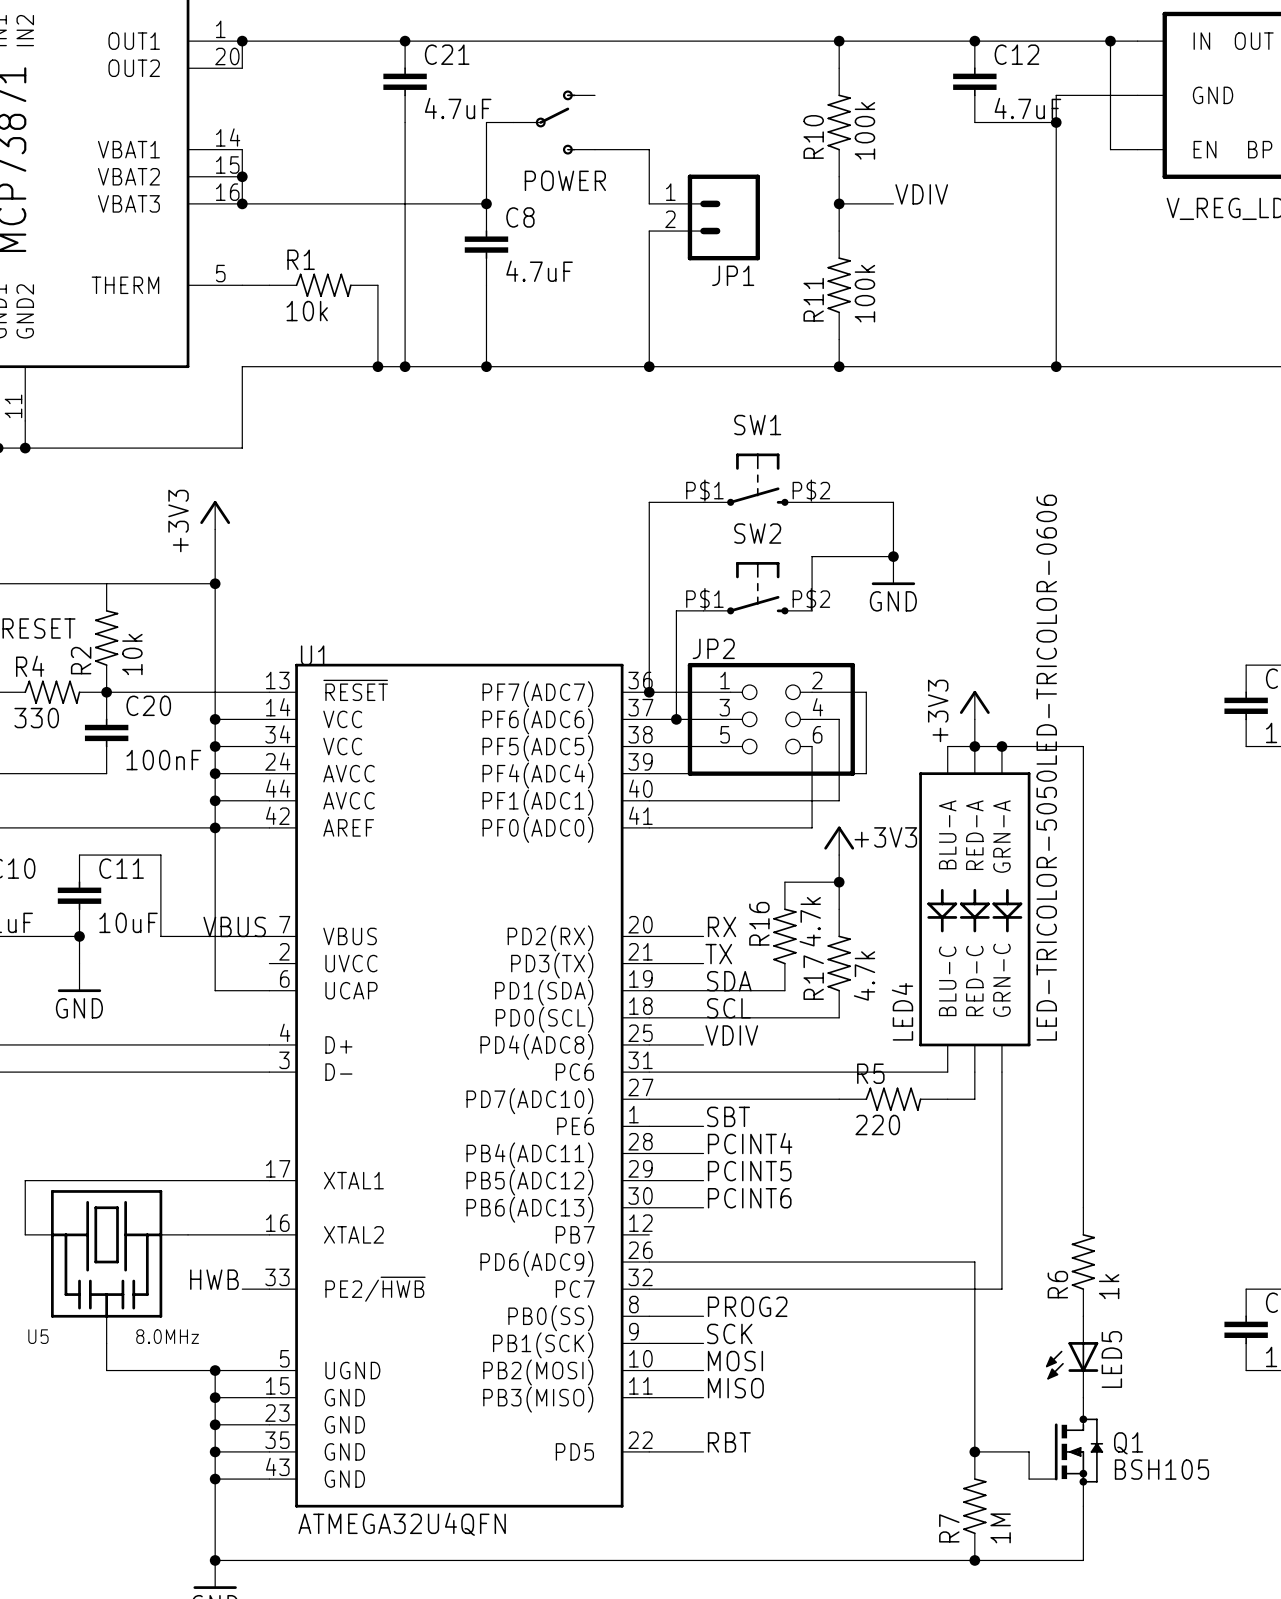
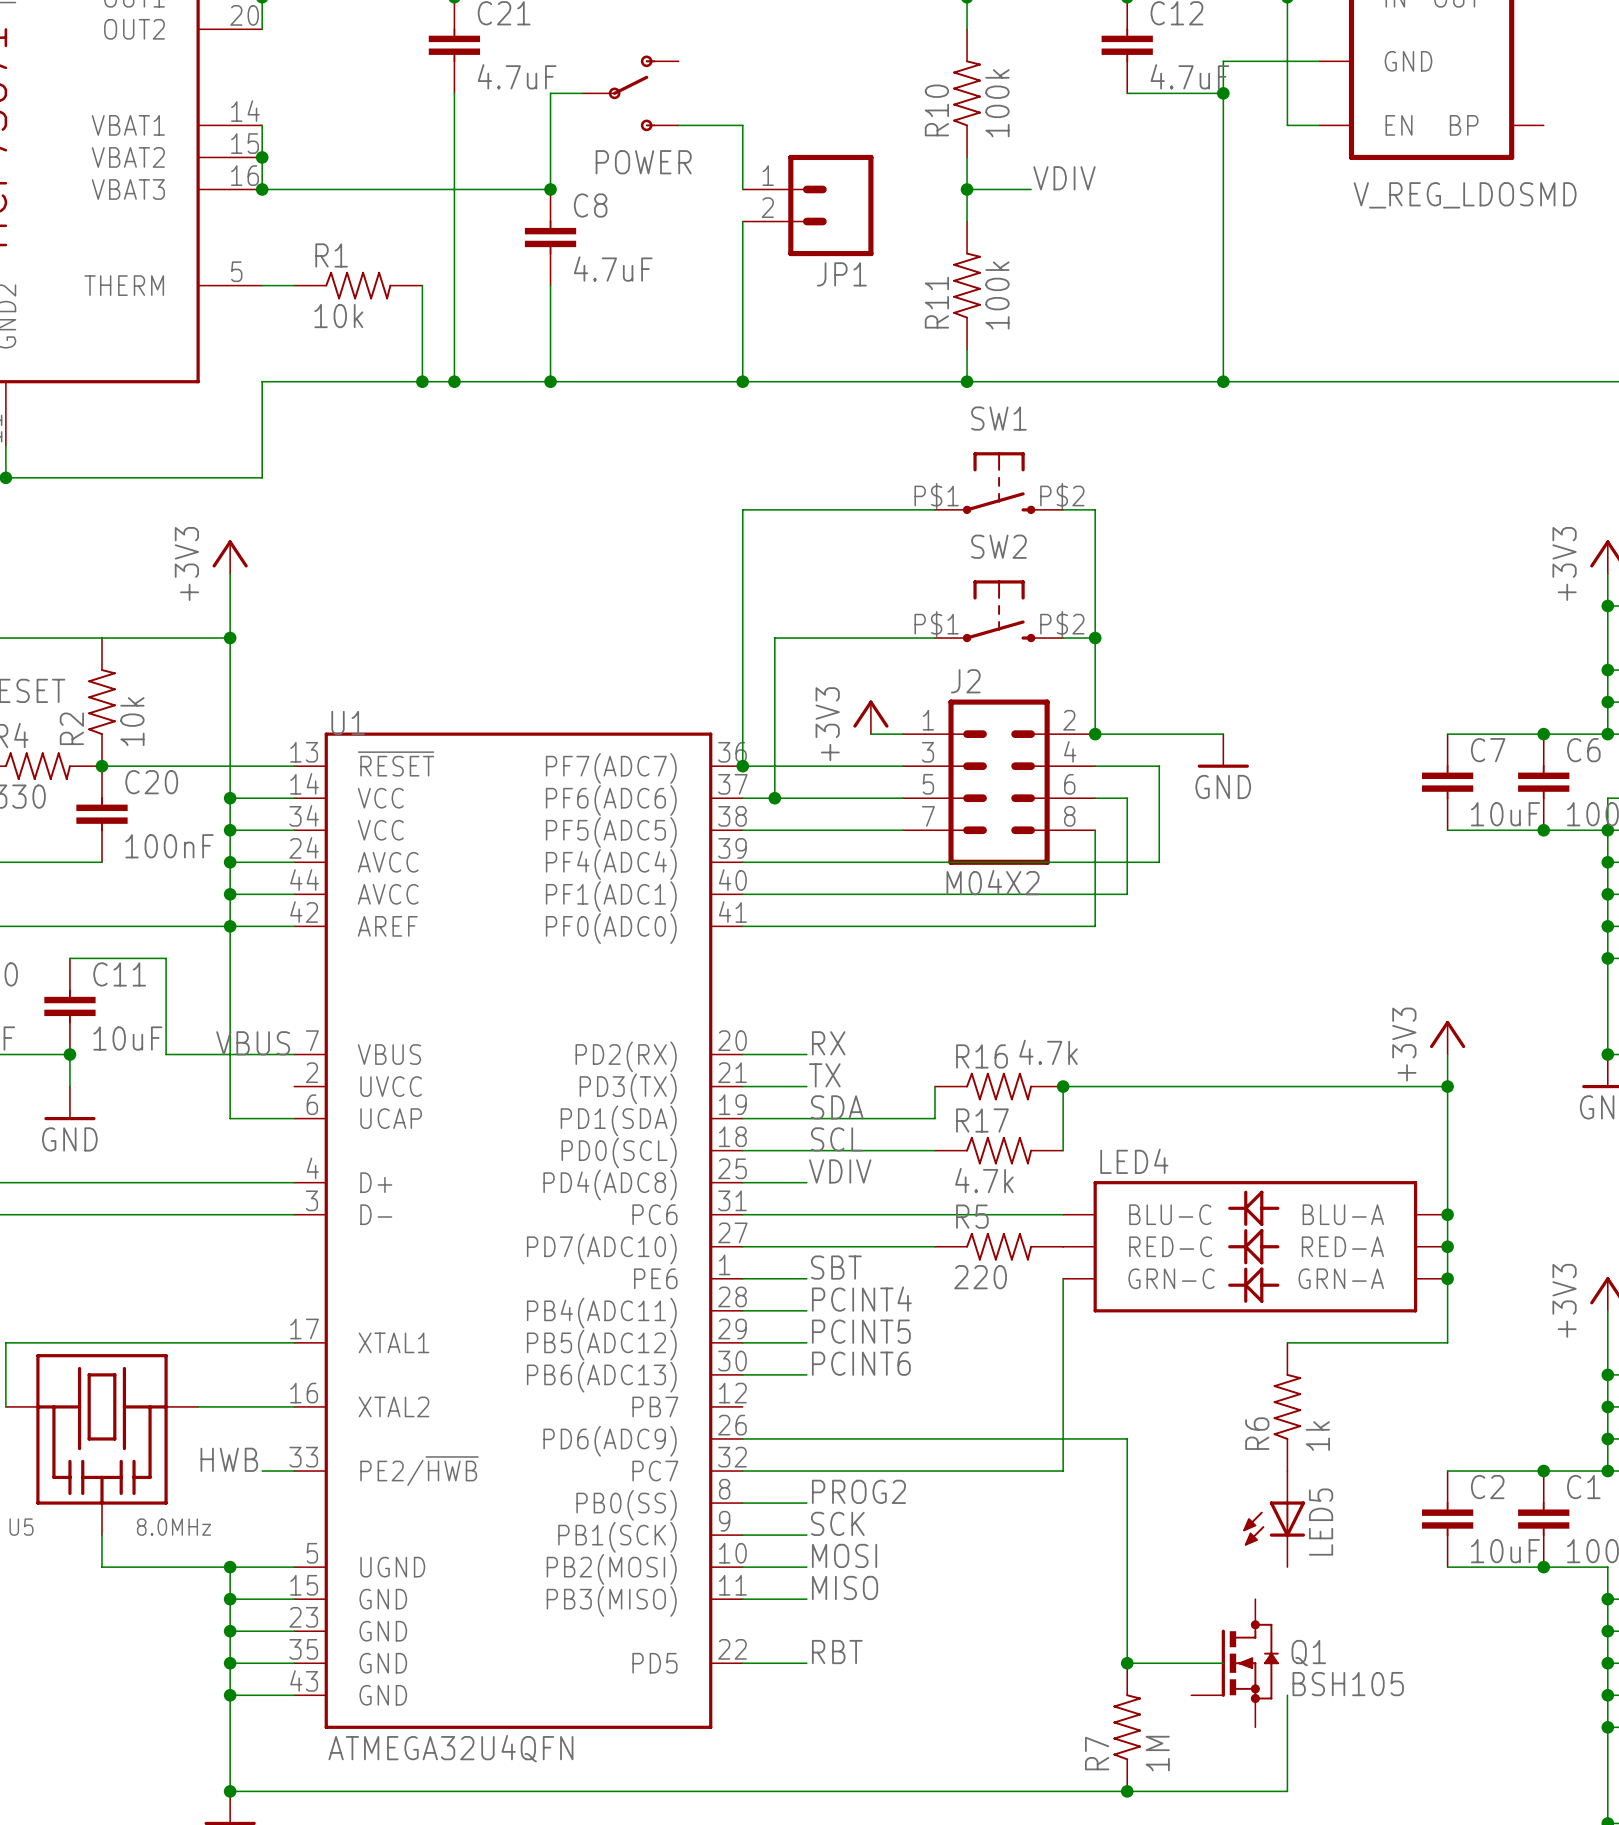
wire: none -> (1063, 509) (1095, 509) (1095, 734) (1223, 734)
SW1 position: (757, 479) -> (999, 483)
wire: (649, 502) (703, 502) -> (742, 541) (742, 509) (934, 509)
wire: (812, 502) (893, 502) (893, 556) (812, 556) (812, 610) -> none
junction: (893, 556) -> none
power symbol position: GND (893, 570) -> GND (1223, 750)
wire: none -> (1063, 638) (1095, 638)
junction: none -> (1095, 638)
SW2 position: (757, 588) -> (999, 611)
wire: (676, 610) (703, 610) -> (774, 670) (774, 638) (934, 638)
power symbol: none -> +3V3 (870, 717)
junction: none -> (1095, 734)
wire: none -> (838, 766) (902, 766)
wire: (812, 692) (866, 692) (866, 773) -> (1095, 766) (1159, 766) (1159, 862) (999, 862)
J2: none -> M04X2 (999, 782)
power symbol: +3V3 (974, 705) -> none
wire: none -> (838, 798) (902, 798)
JP2: (771, 719) -> none
wire: (812, 719) (839, 719) (839, 800) -> (1127, 830) (1127, 894) (967, 894)
wire: none -> (1095, 798) (1127, 798)
wire: (812, 746) (812, 827) -> (1095, 830) (1095, 926) (934, 926)
wire: (947, 746) (1083, 746) (1083, 1207) -> none
junction: (974, 746) -> none
junction: (1001, 746) -> none
LED4 value: LED-TRICOLOR-5050LED-TRICOLOR-0606 (1046, 767) -> none
power symbol: +3V3 (839, 840) -> none
wire: (839, 855) (839, 909) -> none
wire: (784, 882) (839, 882) -> (838, 830) (902, 830)
junction: (839, 882) -> none
LED4 rotation: 0° (974, 909) -> 90° clockwise (1255, 1246)
LED4 position: (974, 909) -> (1255, 1246)
R16 value position: 4.7k (810, 921) -> 4.7k (1048, 1052)
power symbol: none -> +3V3 (1447, 1037)
R16 rotation: 0° (784, 936) -> 90° clockwise (999, 1086)
R16 position: (784, 936) -> (999, 1086)
wire: none -> (1447, 1054) (1447, 1342) (1287, 1342)
R17 rotation: 0° (839, 963) -> 90° clockwise (999, 1150)
junction: none -> (1063, 1086)
wire: none -> (1447, 1086) (1063, 1086) (1063, 1150)
junction: none -> (1447, 1086)
wire: (974, 1072) (974, 1099) (947, 1099) -> (934, 1086) (934, 1118) (902, 1118)
wire: (1001, 1072) (1001, 1289) (920, 1289) -> (1063, 1278) (1063, 1471)
junction: none -> (1447, 1214)
R5 position: (893, 1099) -> (999, 1246)
junction: none -> (1447, 1246)
junction: none -> (1447, 1278)
R6 position: (1083, 1262) -> (1287, 1406)
LED5 position: (1072, 1356) -> (1274, 1519)
wire: (1029, 1451) (1029, 1479) -> (1191, 1663) (1223, 1663)
wire: (1083, 1506) (1083, 1560) -> (1287, 1695) (1287, 1791) (1255, 1791)

